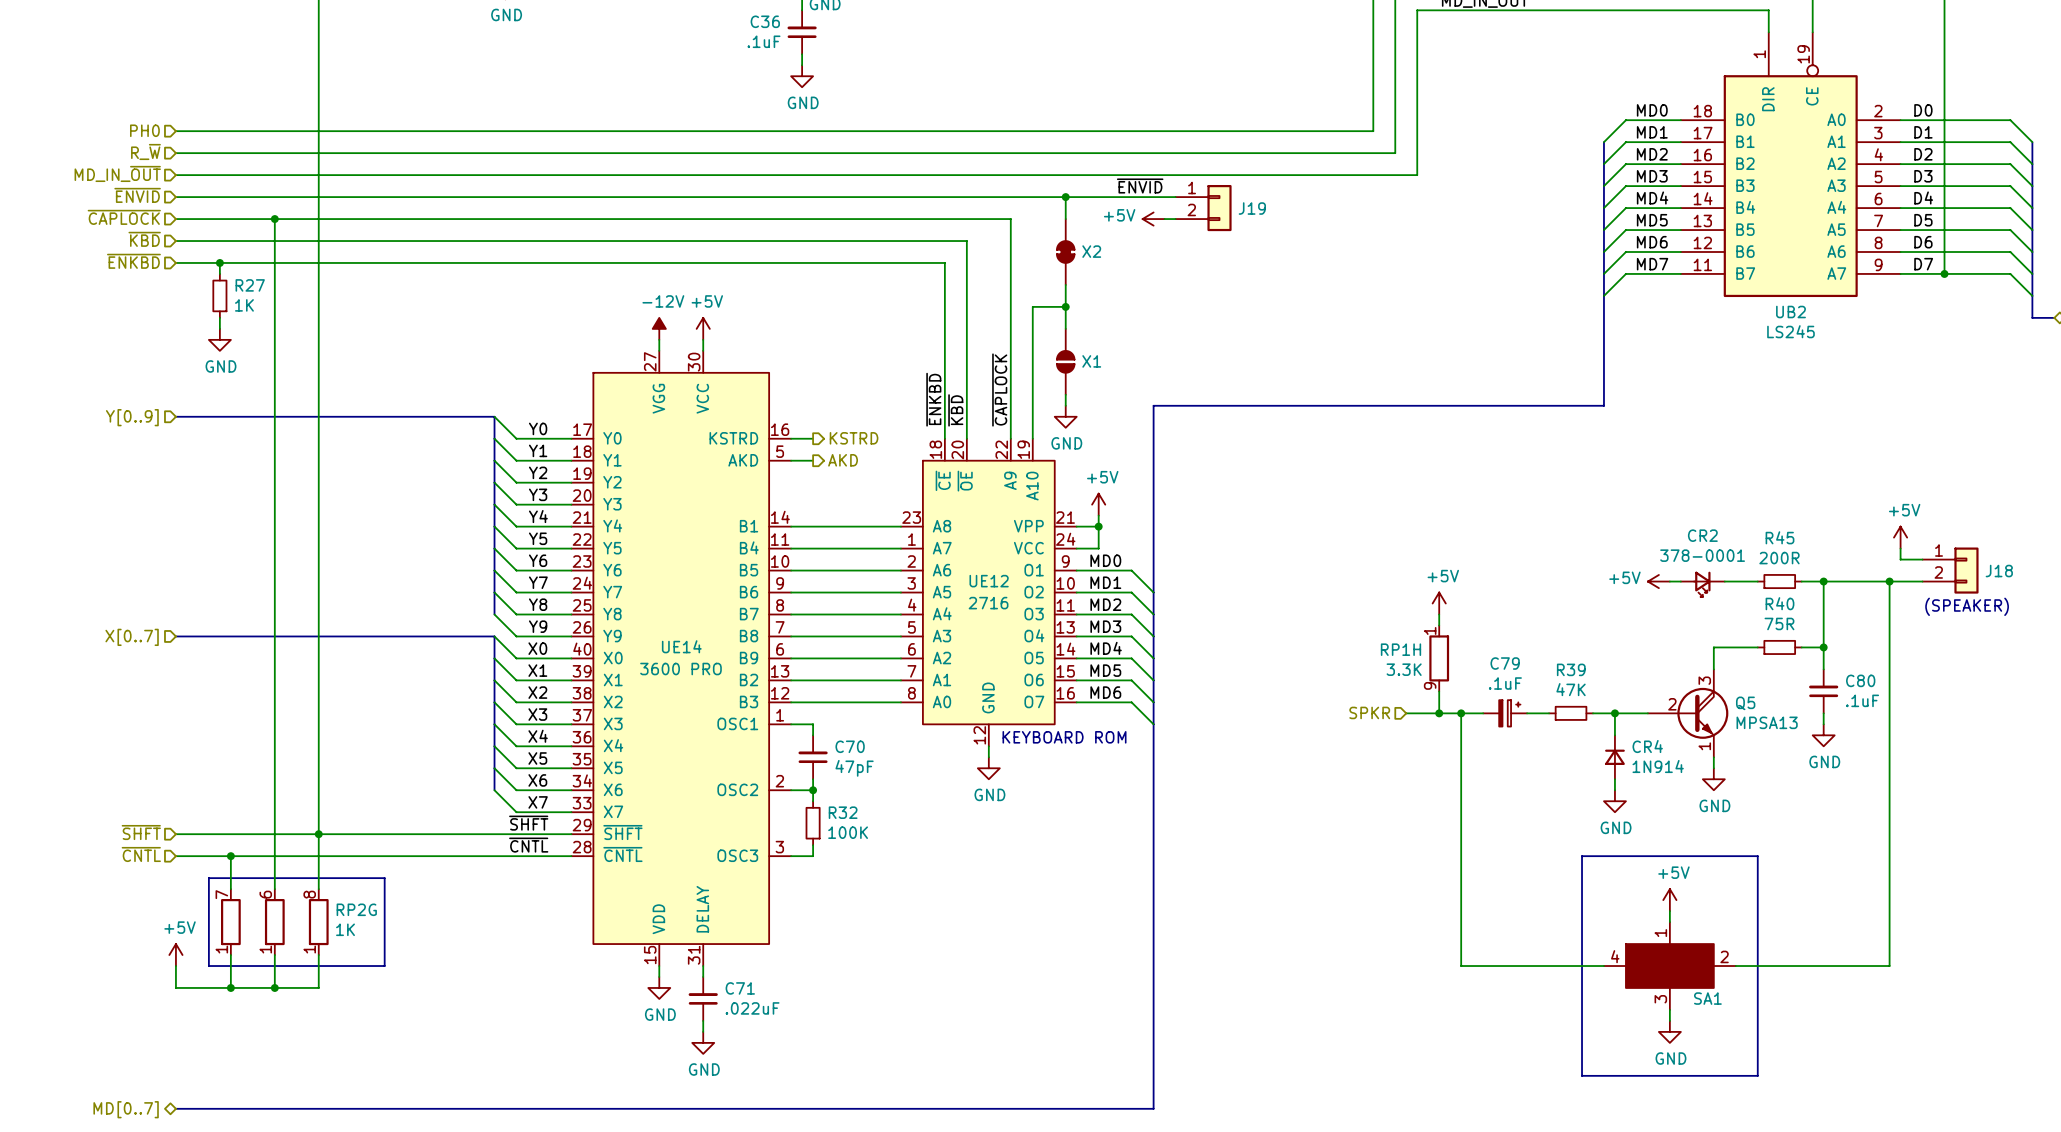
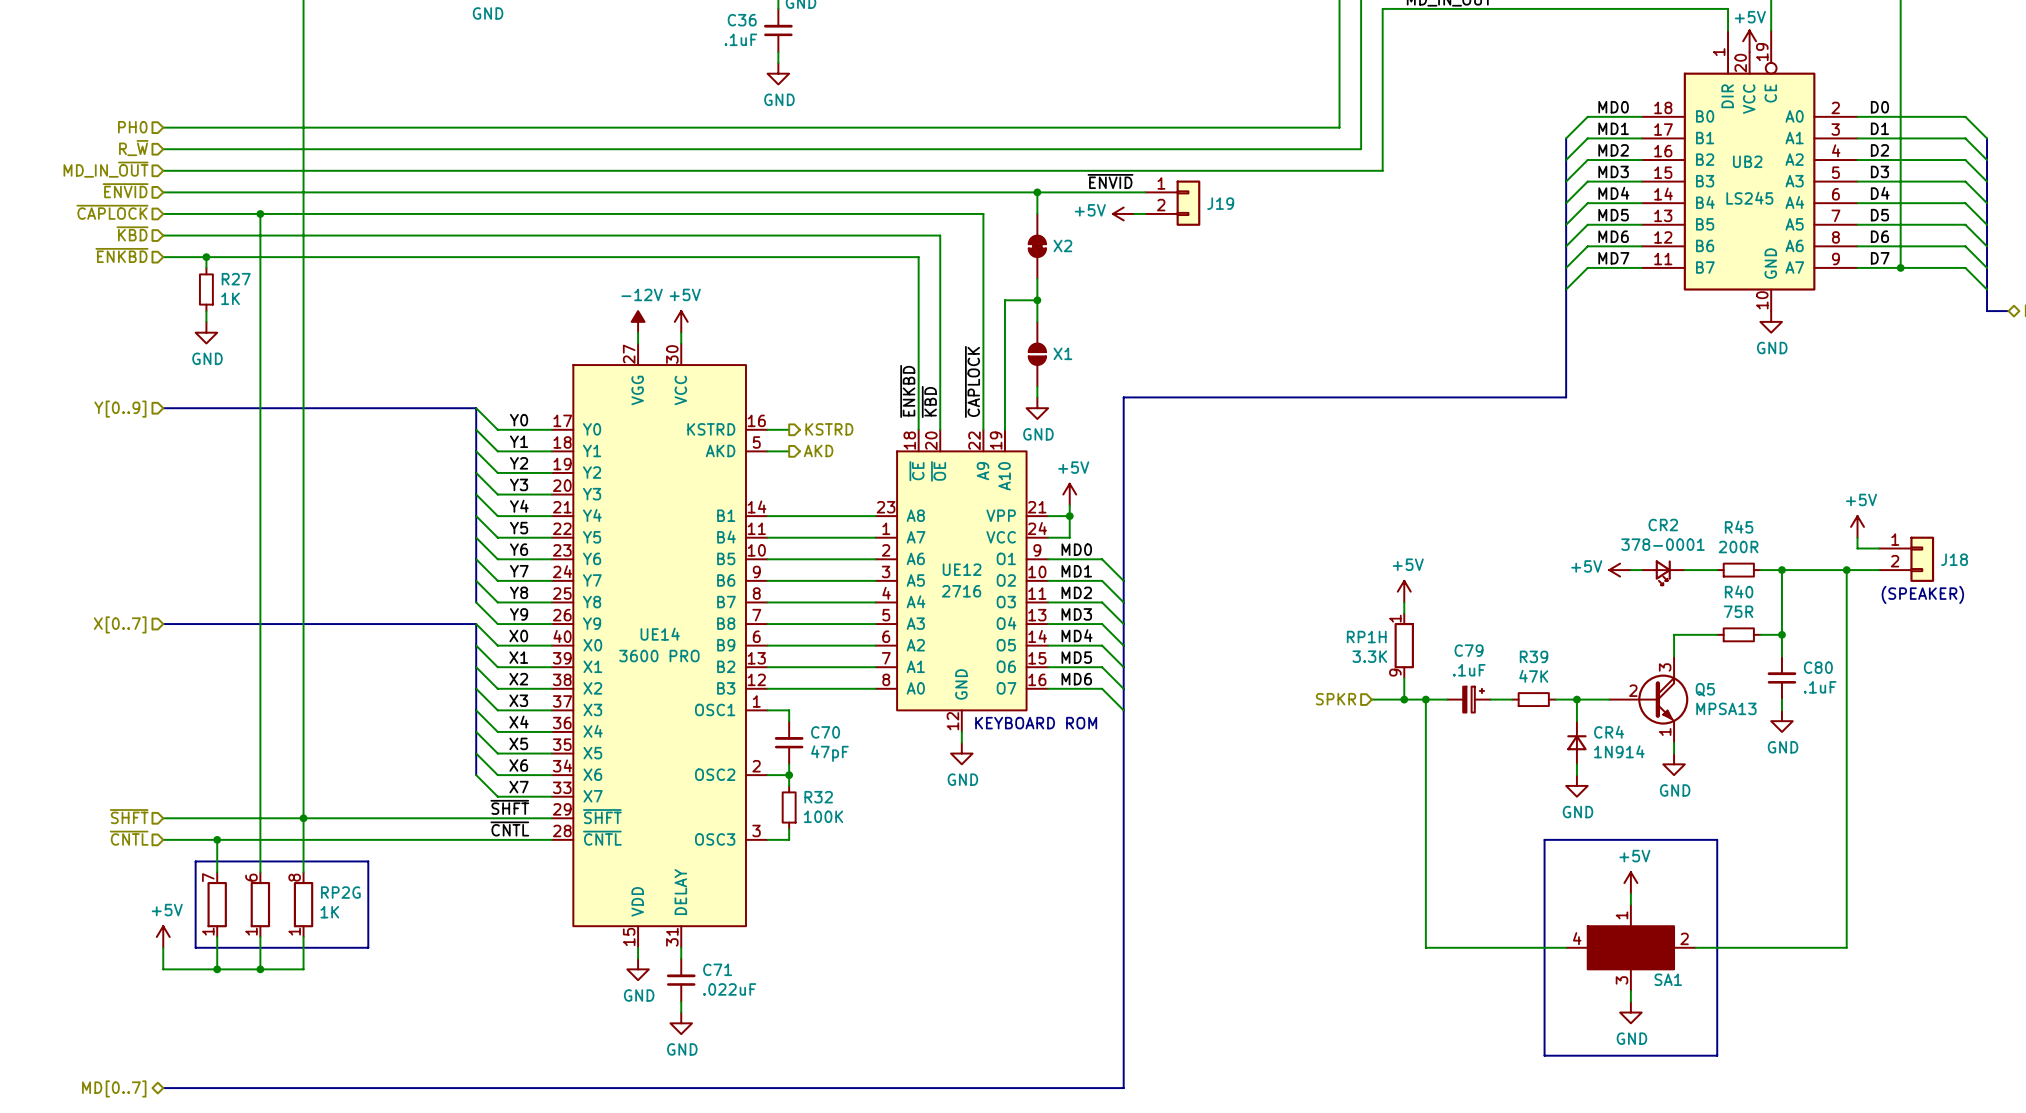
UB2 symbol: [1680, 32, 1901, 298] -> [1641, 30, 1858, 312]
power symbol: none -> +5V (1749, 41)
UB2 name position: UB2 (1790, 312) -> UB2 (1747, 161)
power symbol: none -> GND (1771, 321)
UB2 value position: LS245 (1790, 331) -> LS245 (1749, 198)

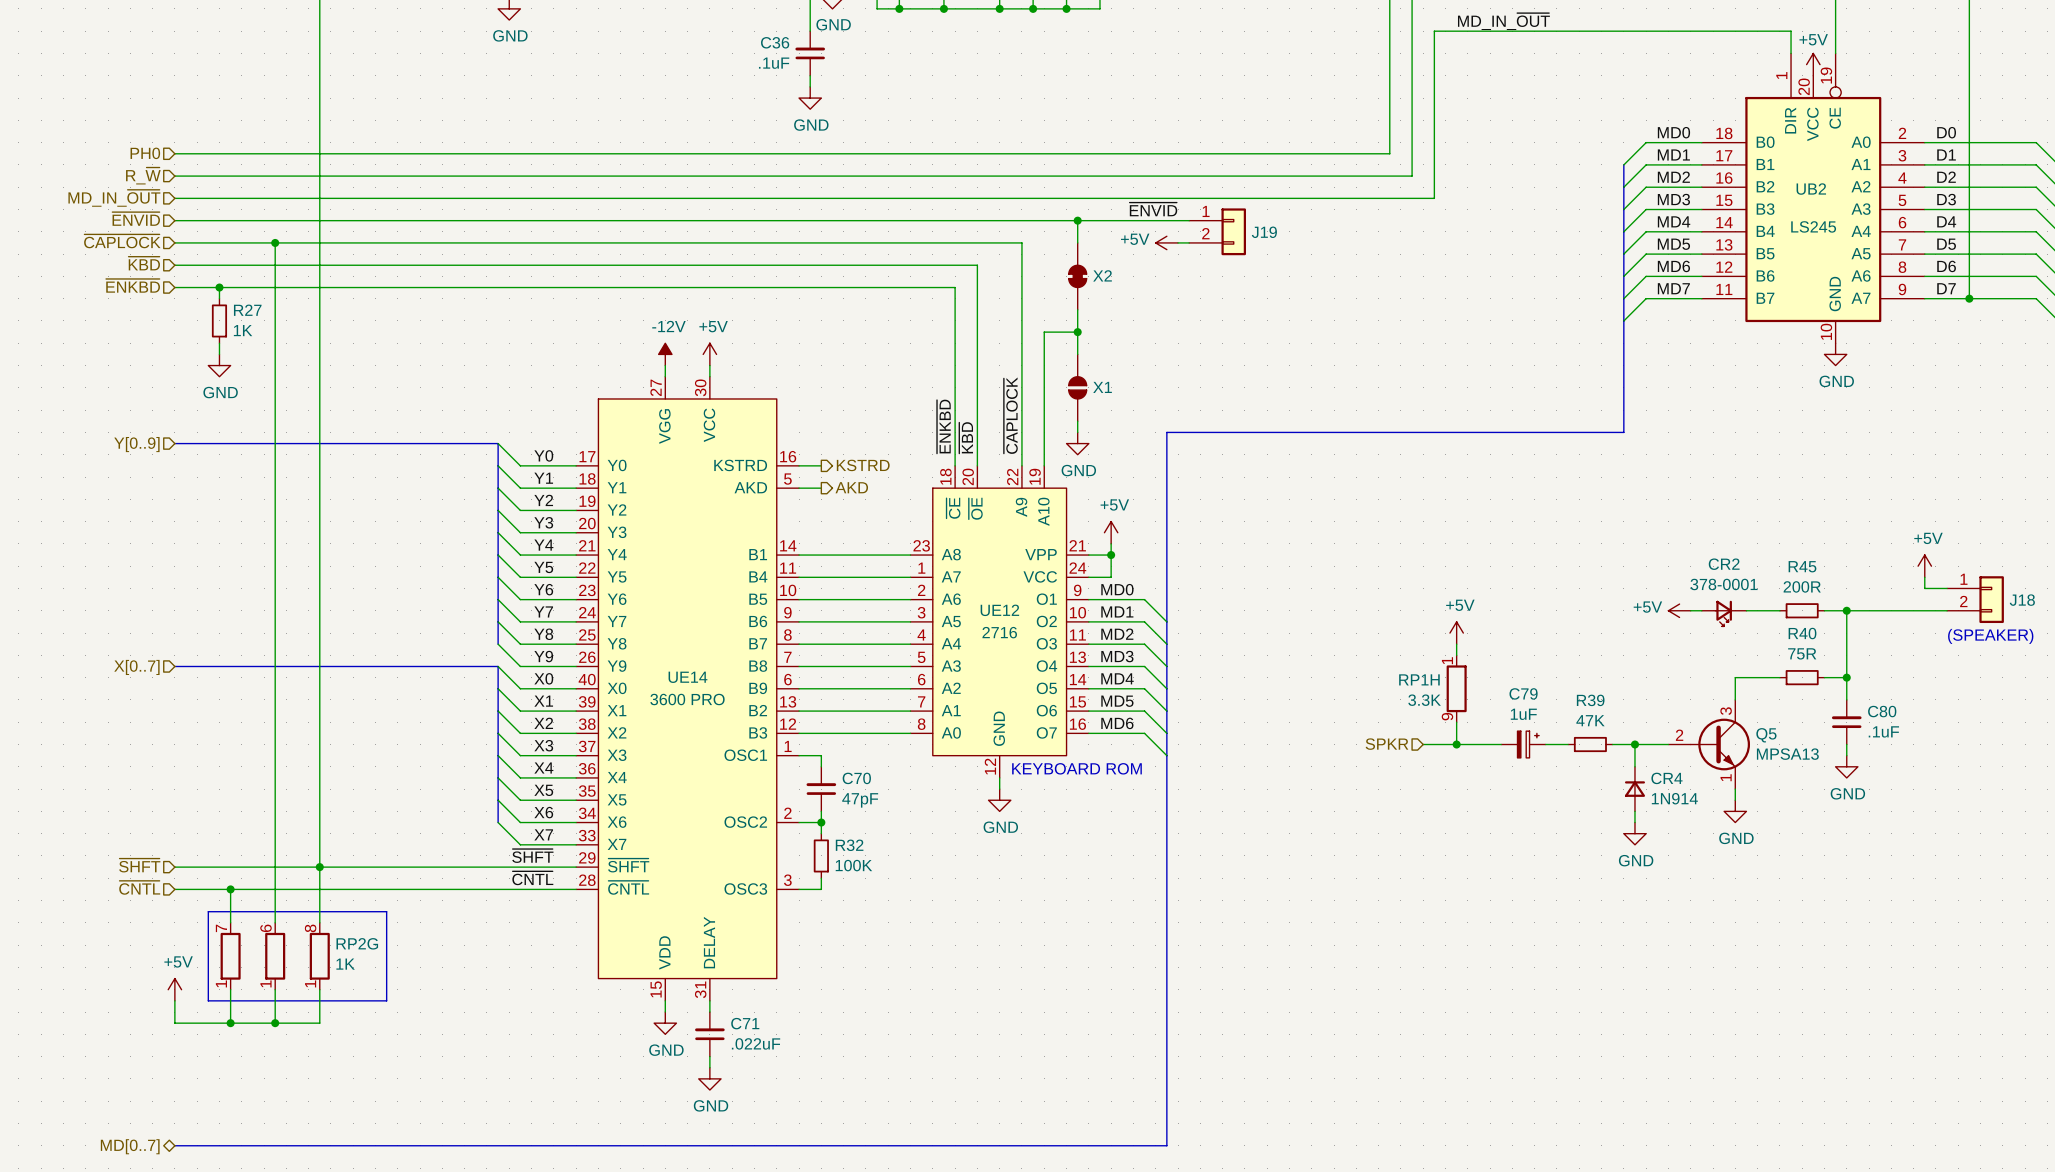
wire: (1846, 570) (1846, 947) (1695, 947) -> none
junction: (1846, 570) -> none
Q5 symbol: [1609, 656, 1689, 743] -> [1668, 699, 1751, 790]
C79 value: .1uF (1469, 670) -> 1uF (1523, 714)
wire: (1425, 699) (1425, 947) (1566, 947) -> none
junction: (1425, 699) -> none
line: (1544, 839) (1544, 1055) (1717, 1055) (1717, 839) (1544, 839) -> none
power symbol: +5V (1630, 883) -> none
wire: (1630, 893) (1630, 904) -> none
SA1: (1630, 947) -> none
wire: (1630, 990) (1630, 1001) -> none
power symbol: GND (1630, 1012) -> none

